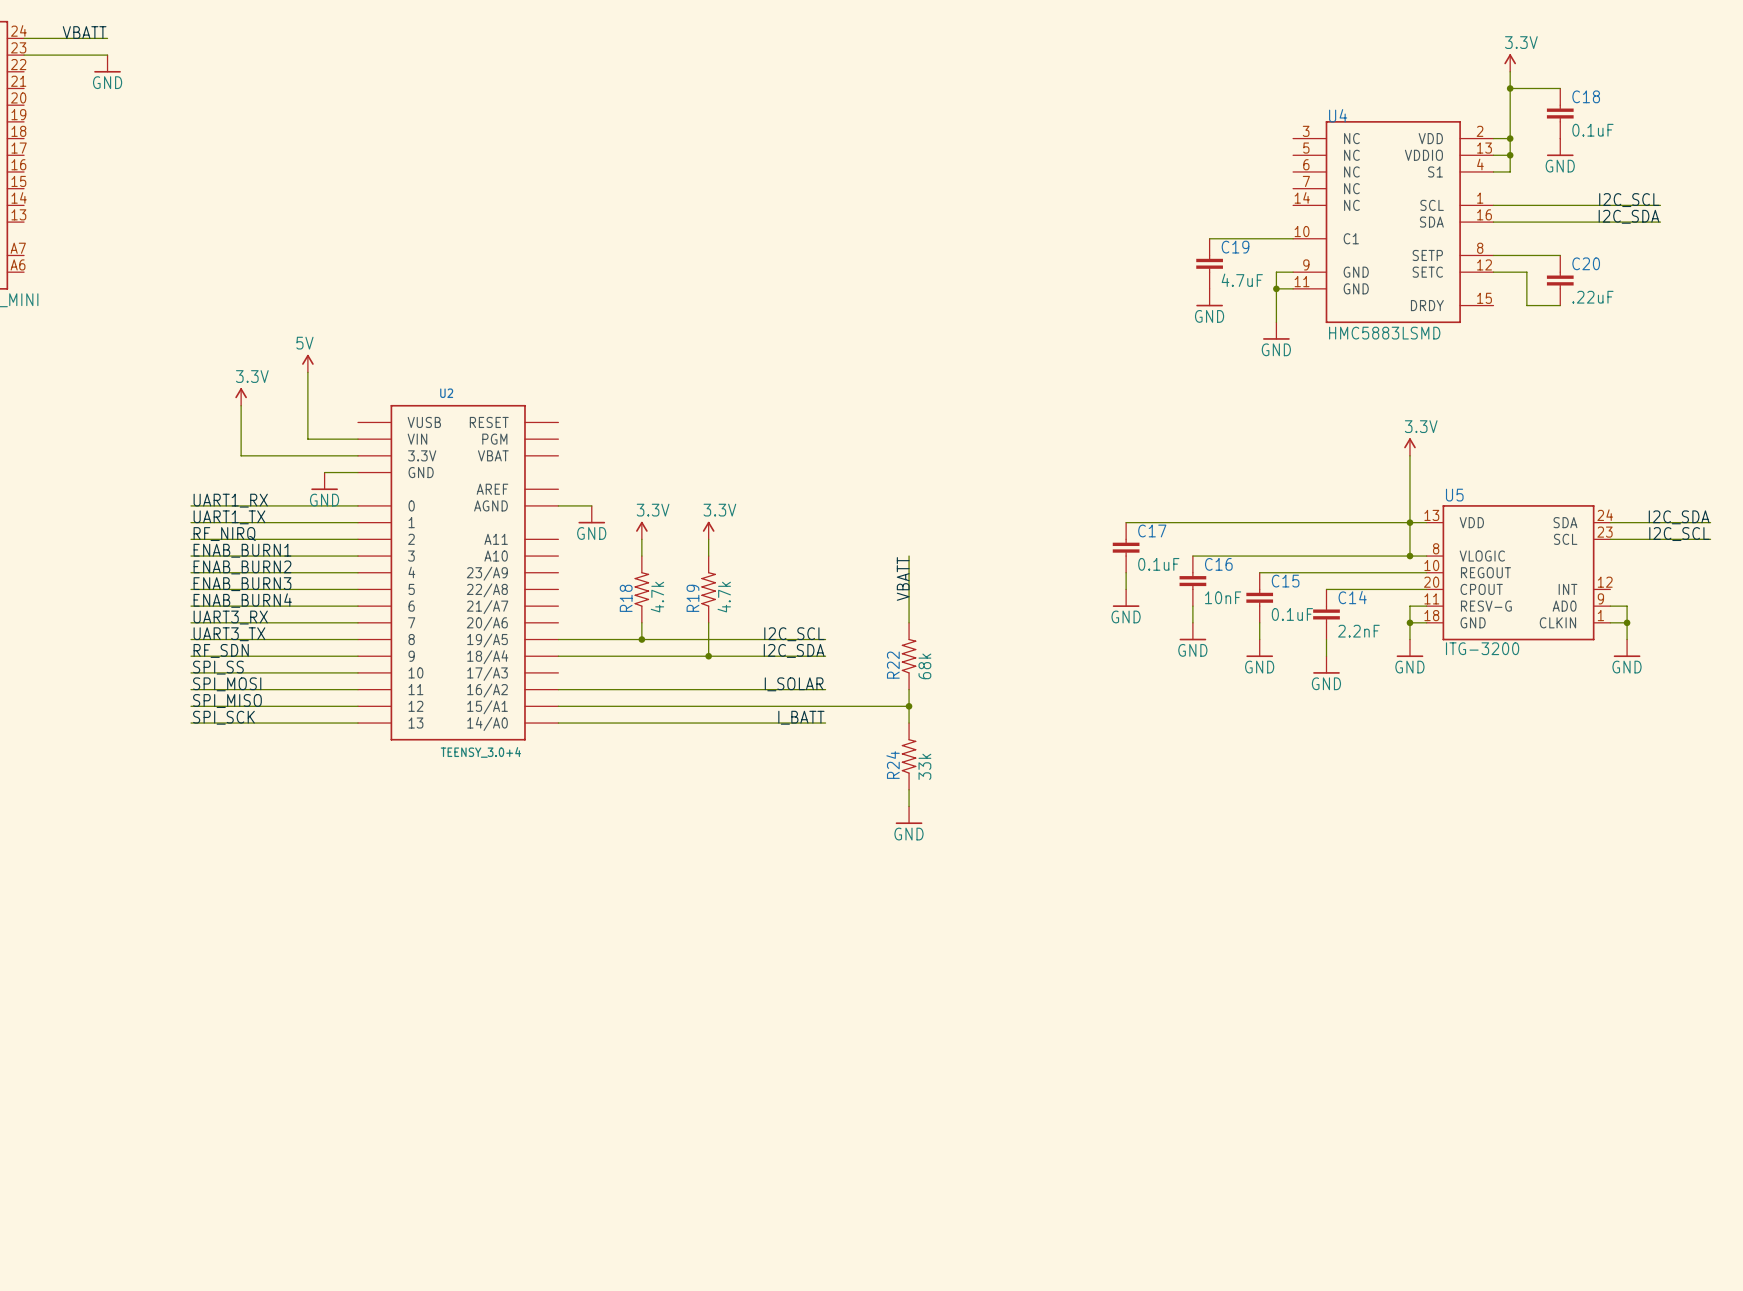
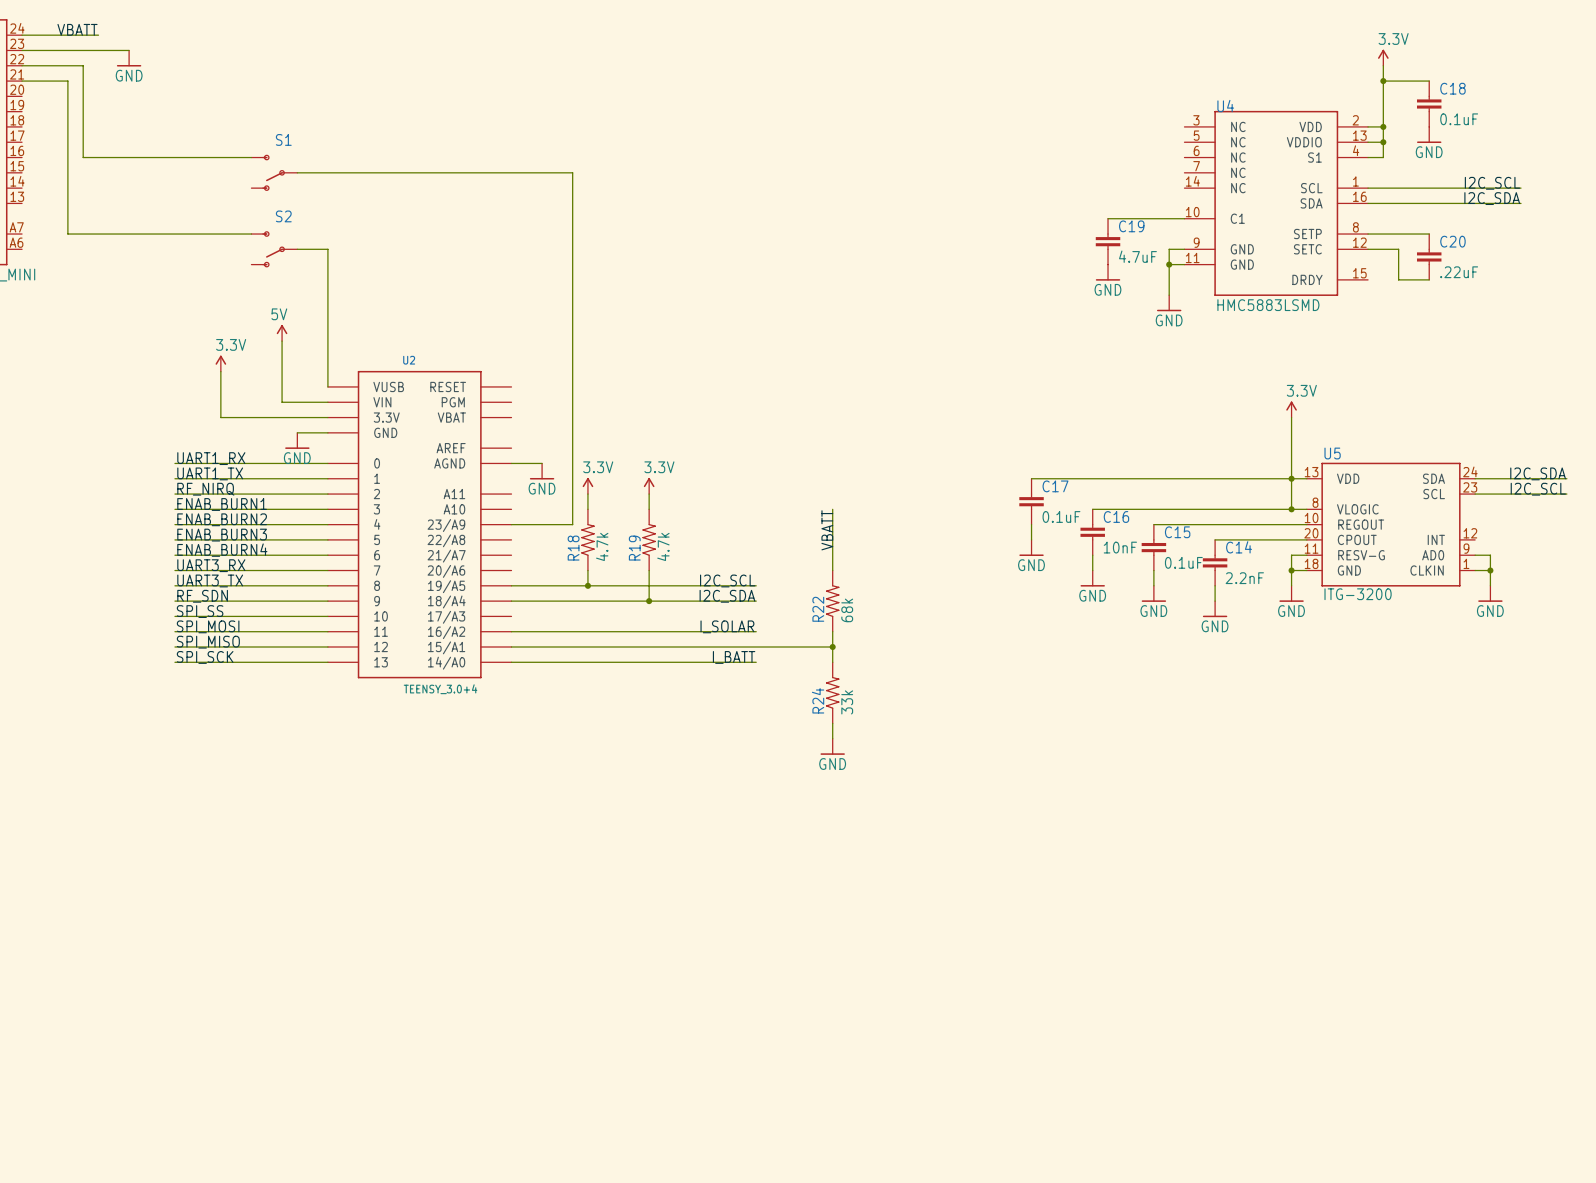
wire: none -> (98, 50) (129, 50)
power symbol position: GND (107, 63) -> GND (129, 58)
wire: none -> (22, 65) (83, 65) (83, 157) (251, 157)
wire: none -> (22, 81) (67, 81) (67, 234) (251, 234)
S1: none -> (274, 172)
wire: none -> (297, 172) (572, 172) (572, 524) (511, 524)
S2: none -> (274, 249)
wire: none -> (297, 249) (327, 249) (327, 386)

